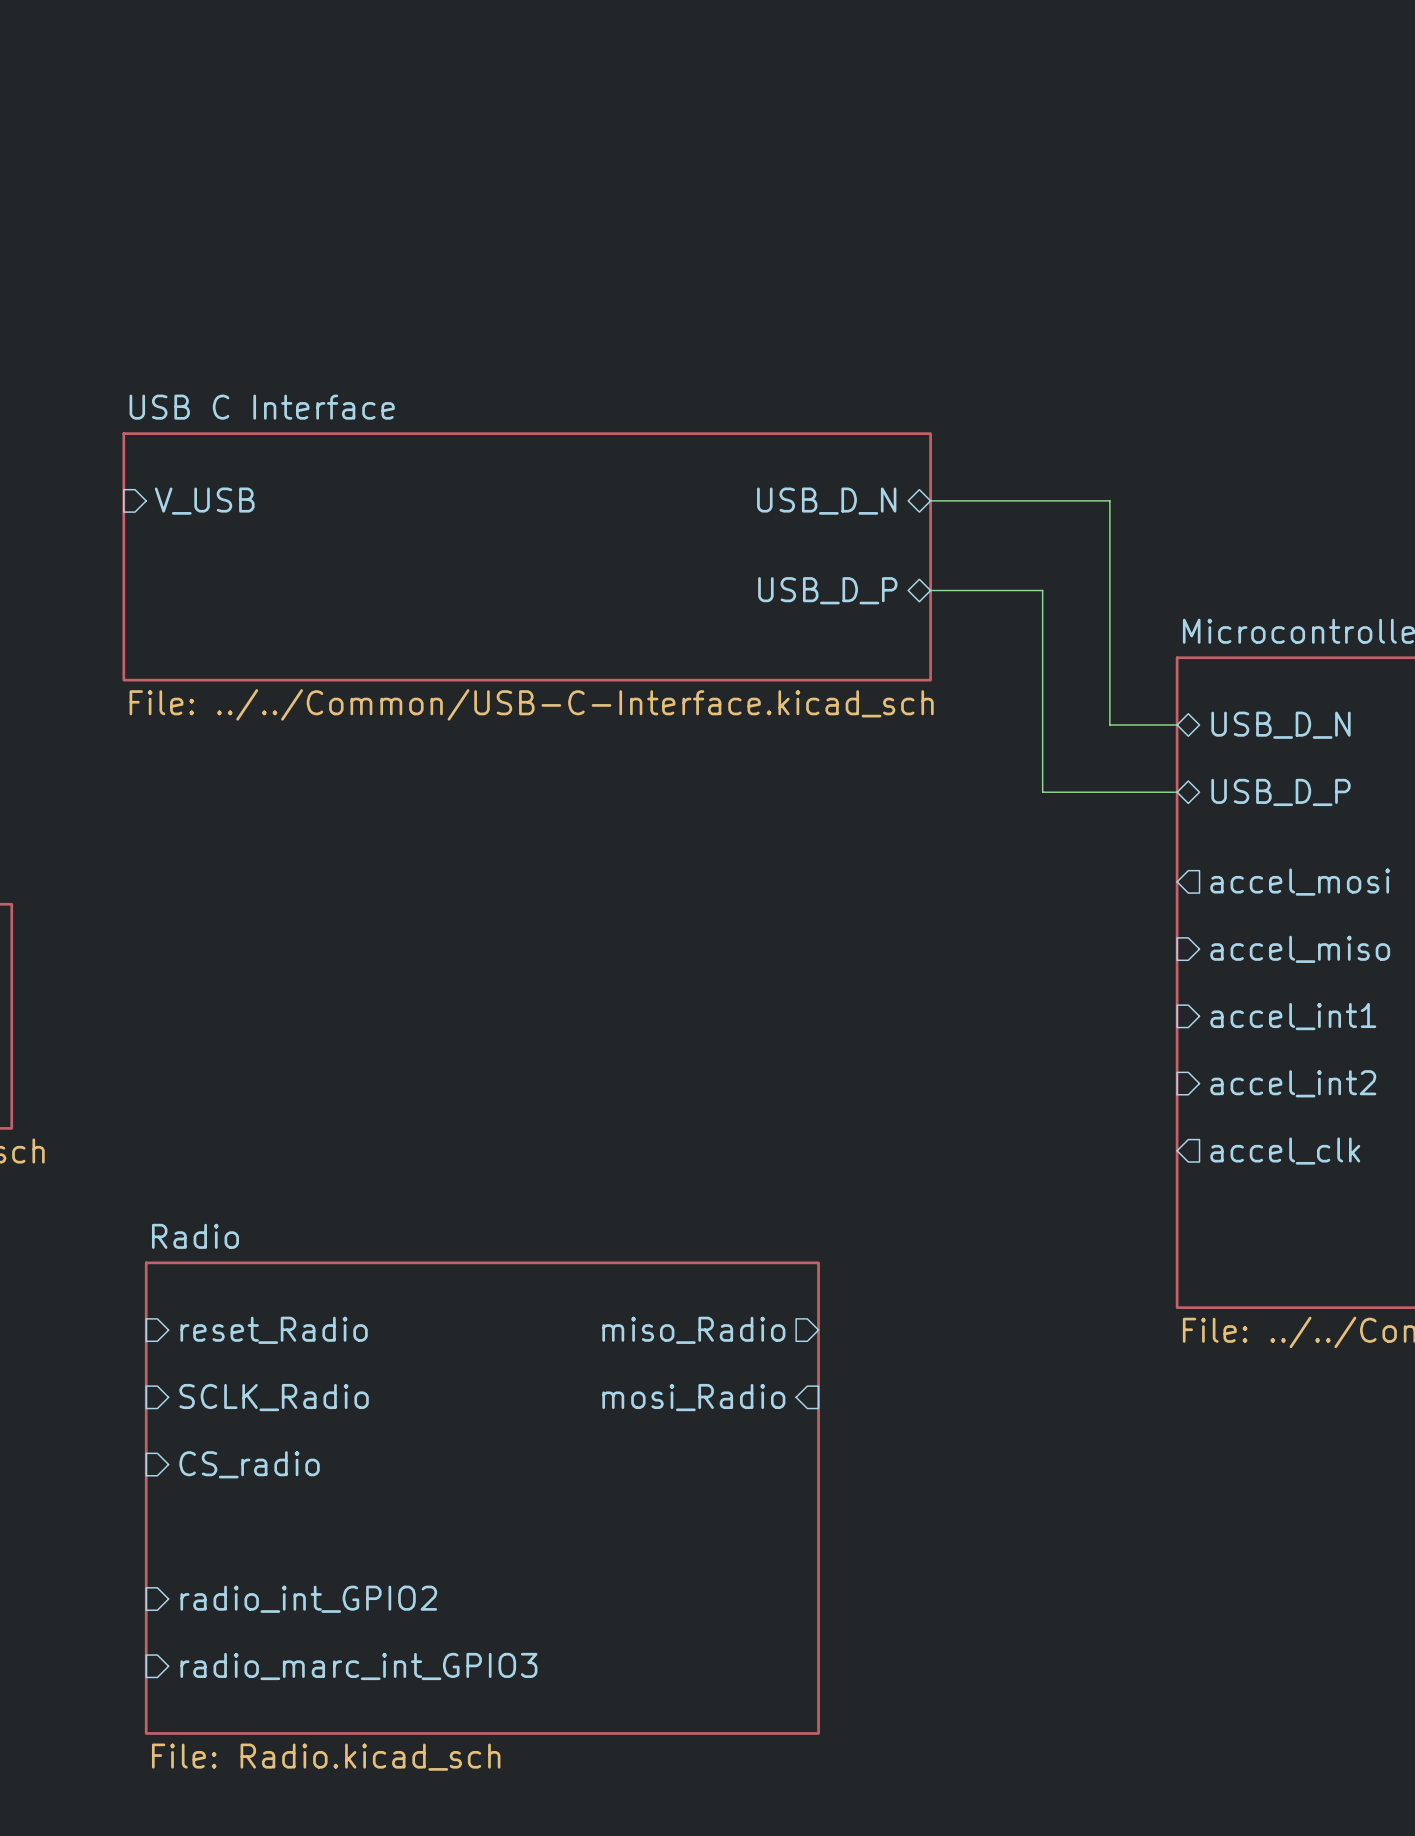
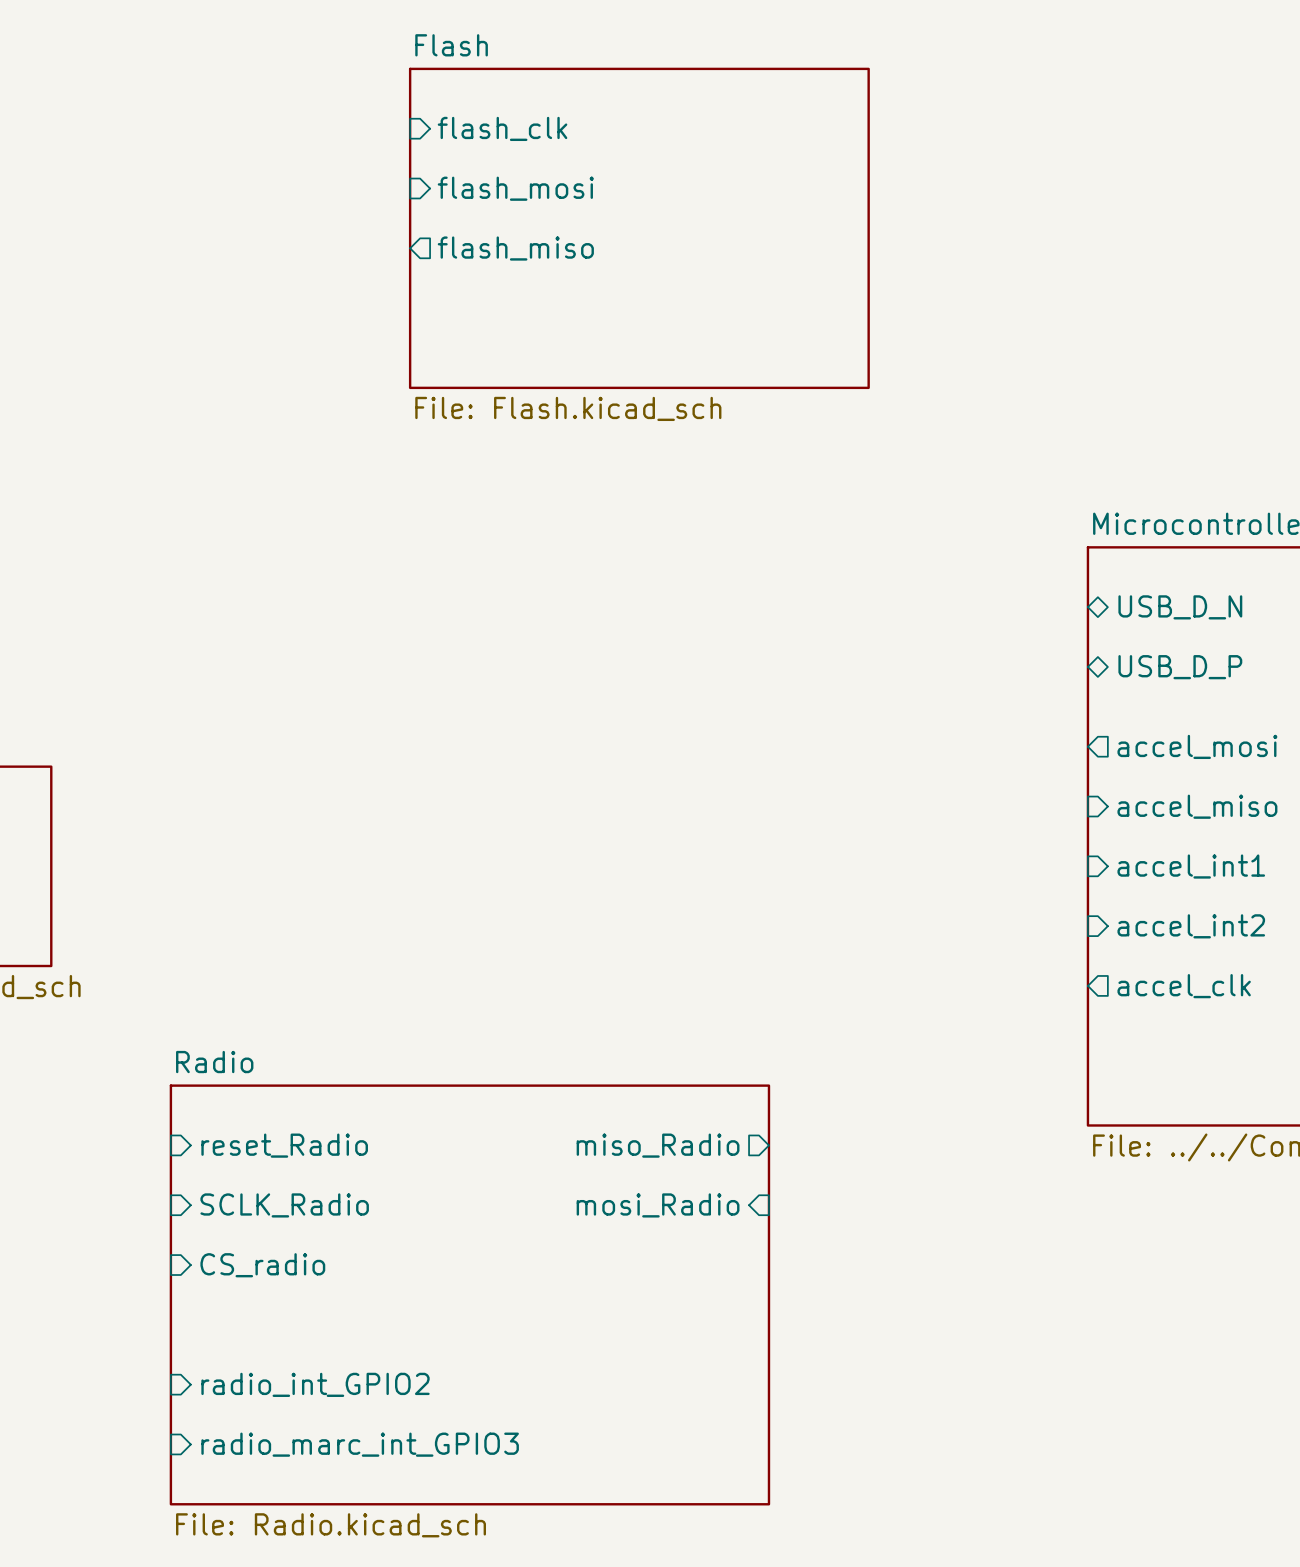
sheet pin: none -> flash_clk (502, 128)
sheet pin: none -> flash_mosi (515, 188)
sheet Flash: none -> File: Flash.kicad_sch (639, 228)
sheet pin: none -> flash_miso (515, 248)
wire: (930, 500) (1109, 500) (1109, 724) (1177, 724) -> none
sheet pin: V_USB (204, 501) -> none
sheet pin: USB_D_N (826, 501) -> none
sheet USB C Interface: File: ../../Common/USB-C-Interface.kicad_sch (527, 556) -> none
sheet pin: USB_D_P (827, 590) -> none
wire: (930, 590) (1042, 590) (1042, 792) (1177, 792) -> none

